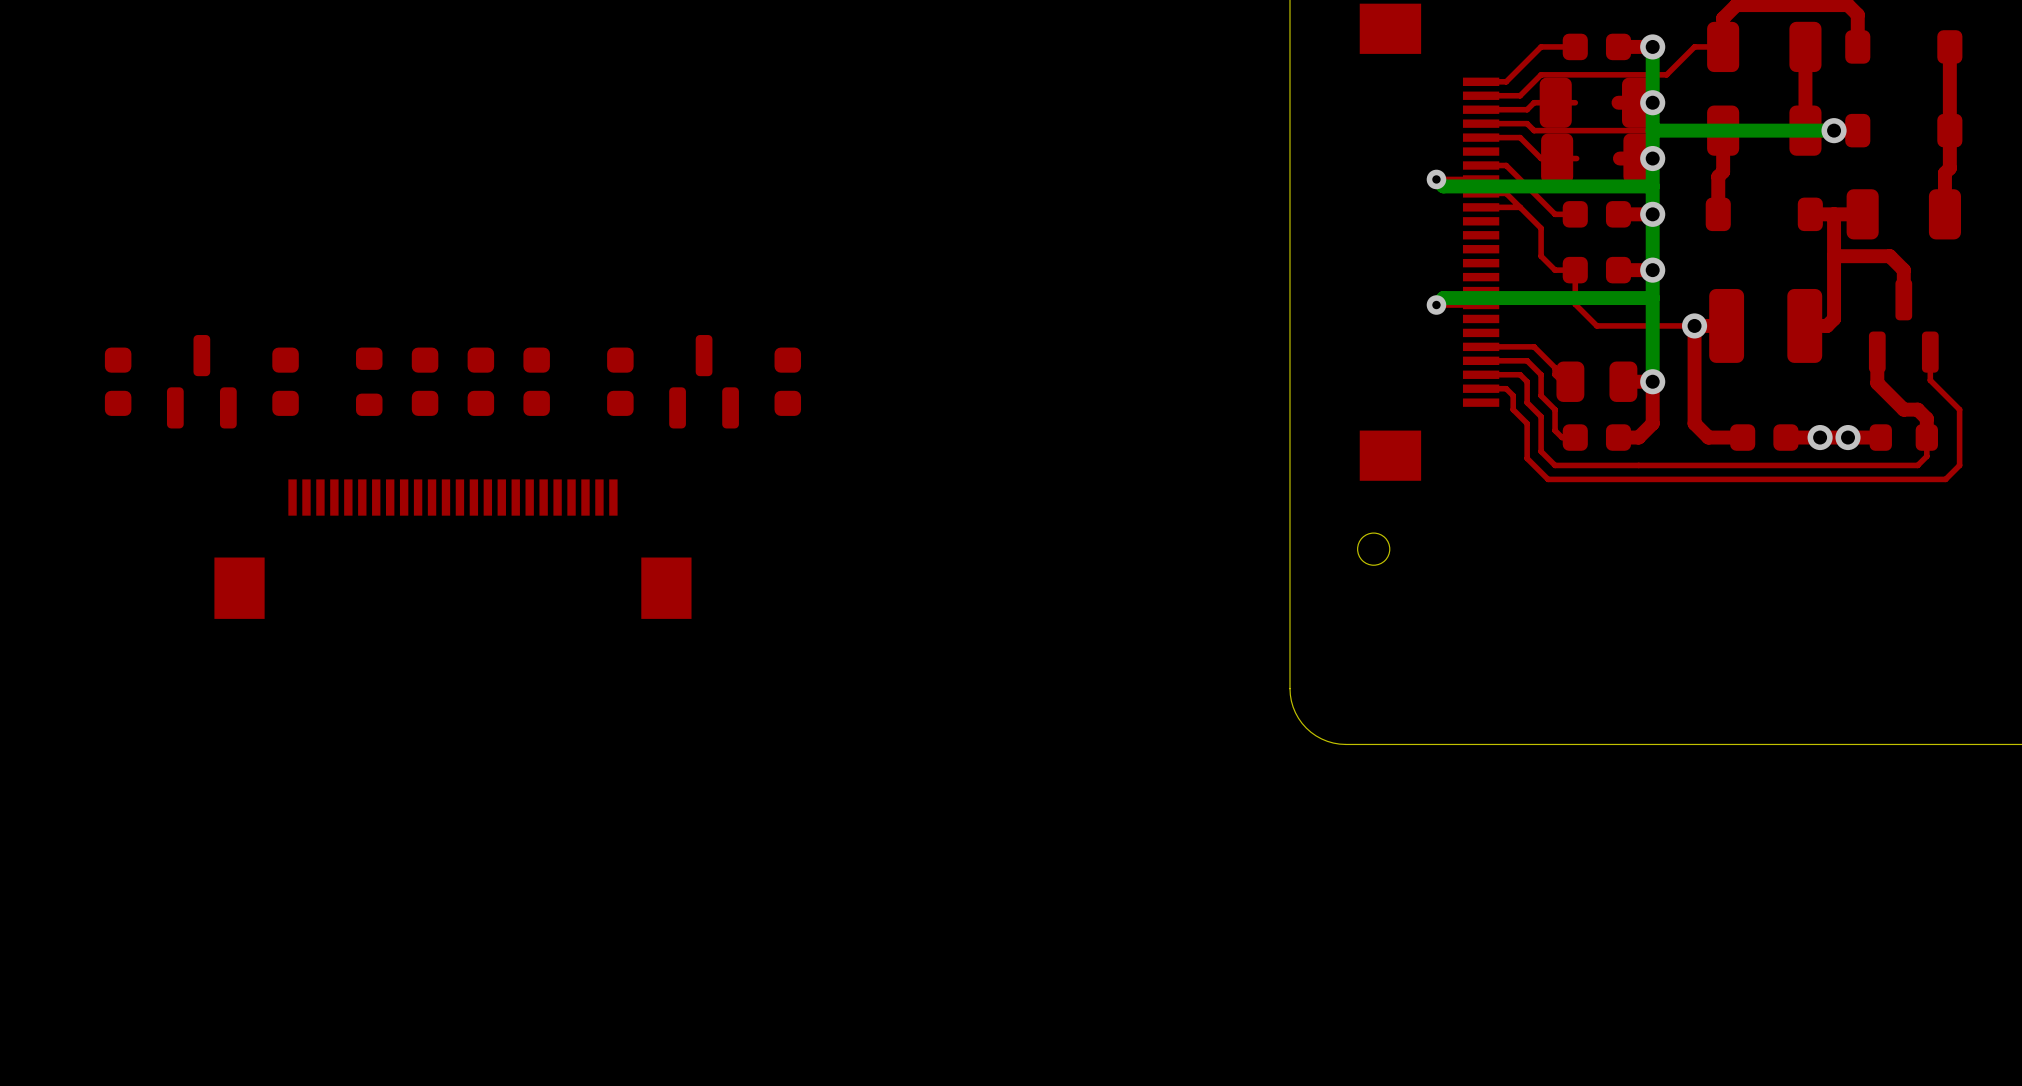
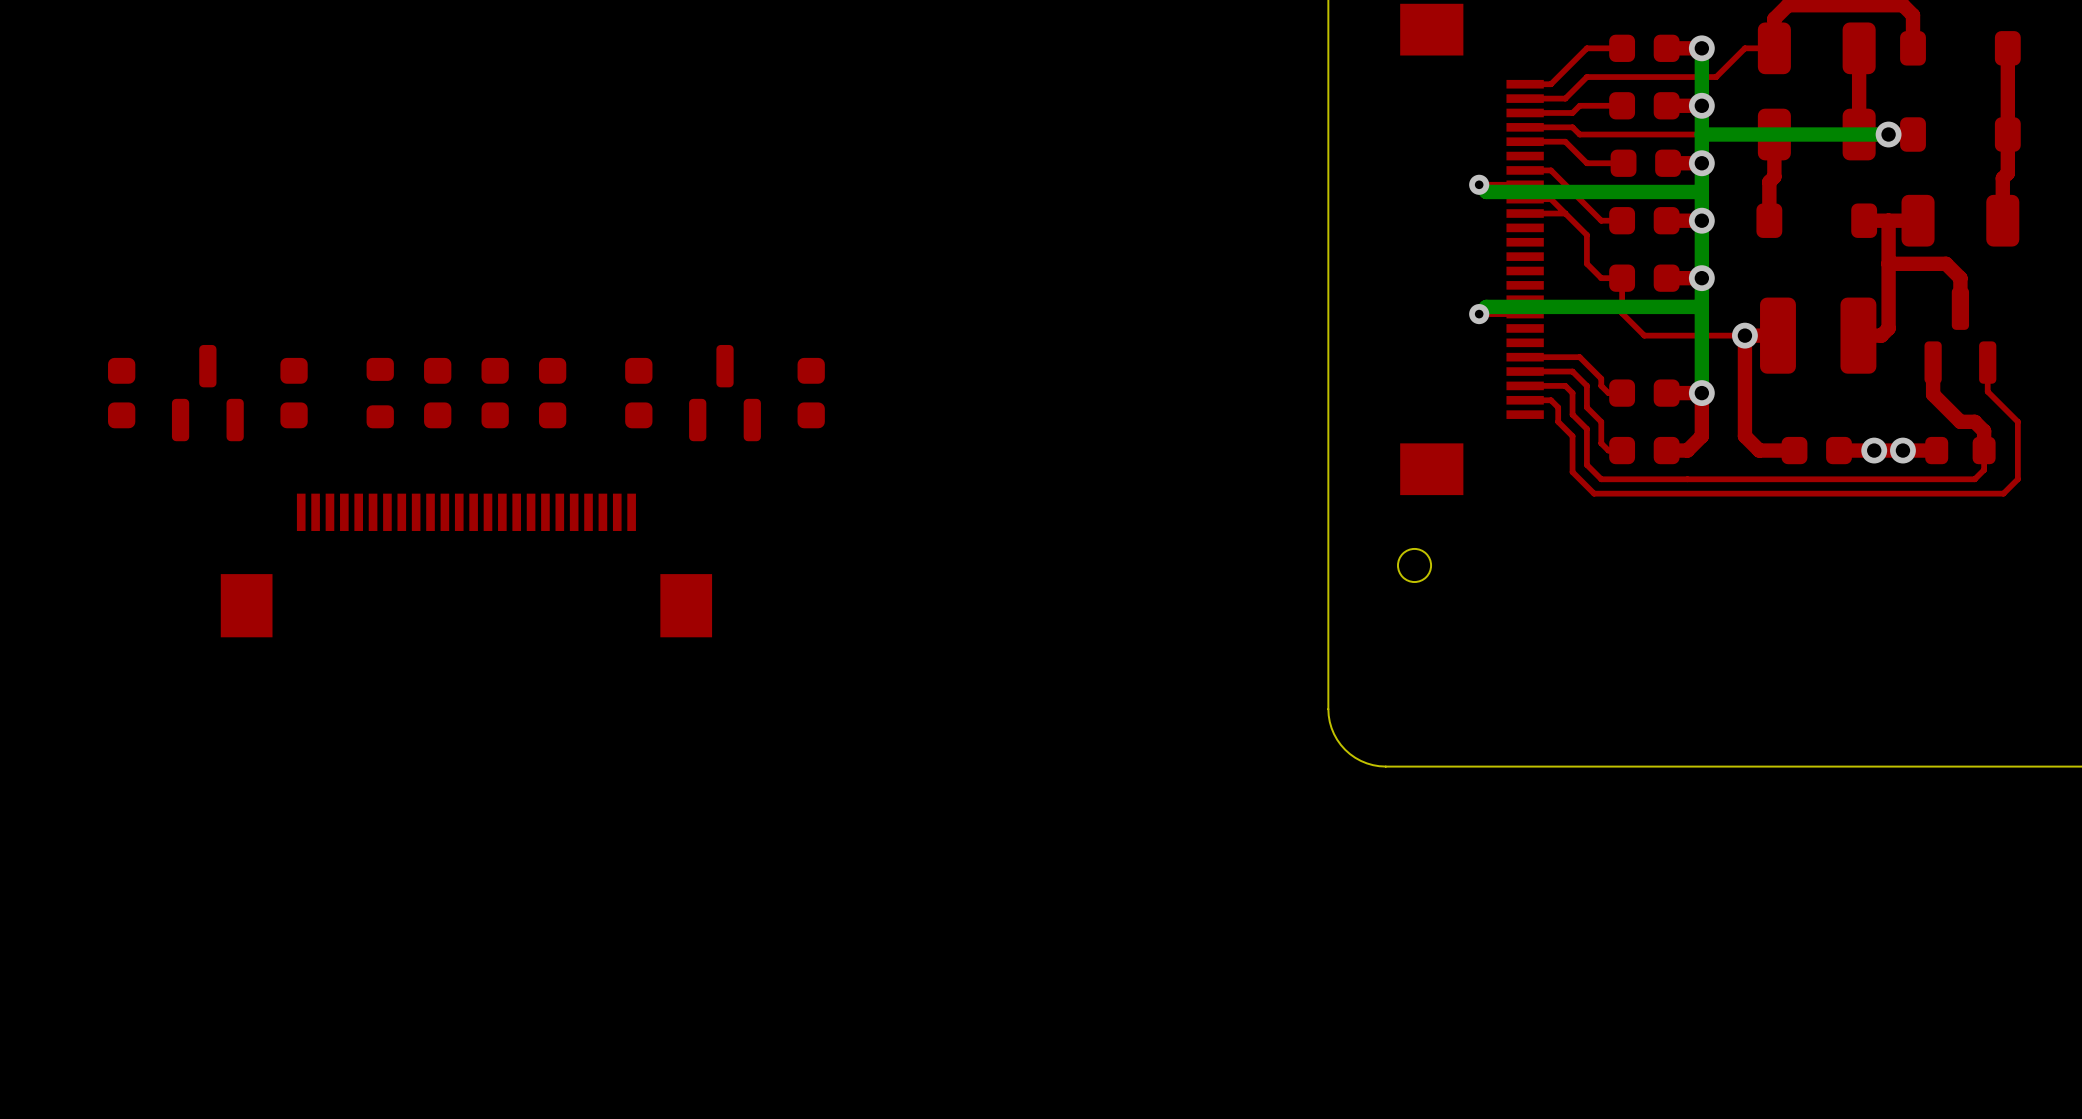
part footprint: [1539, 77, 1655, 128] -> [1609, 92, 1680, 120]
part footprint: [1541, 133, 1656, 184] -> [1610, 149, 1682, 177]
part footprint: [1556, 361, 1638, 402] -> [1609, 379, 1680, 407]

